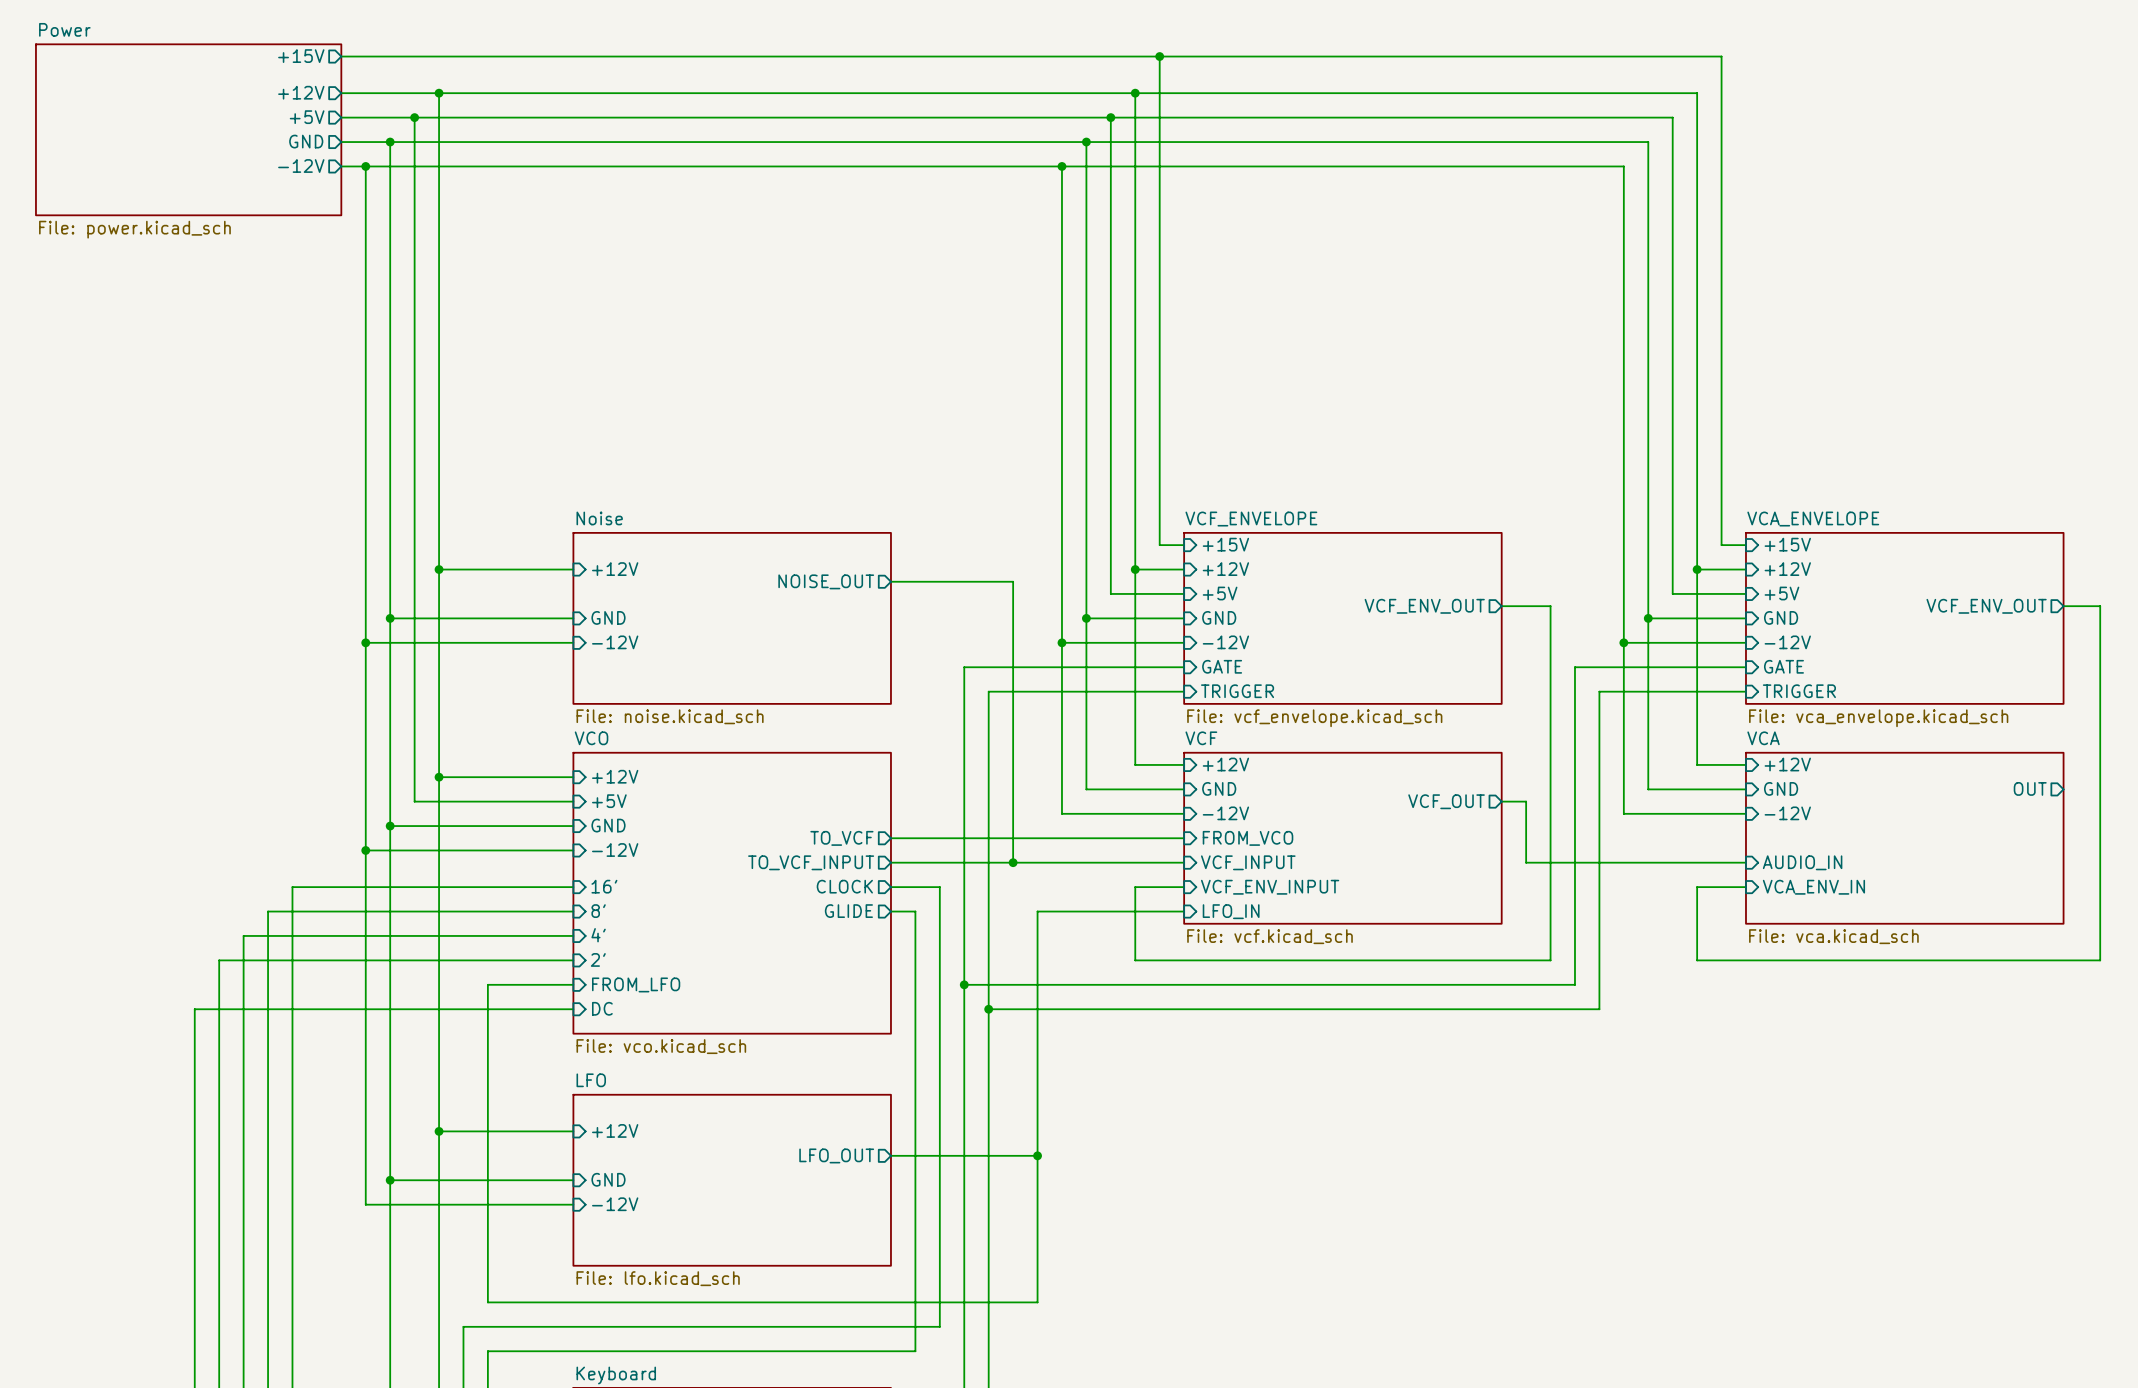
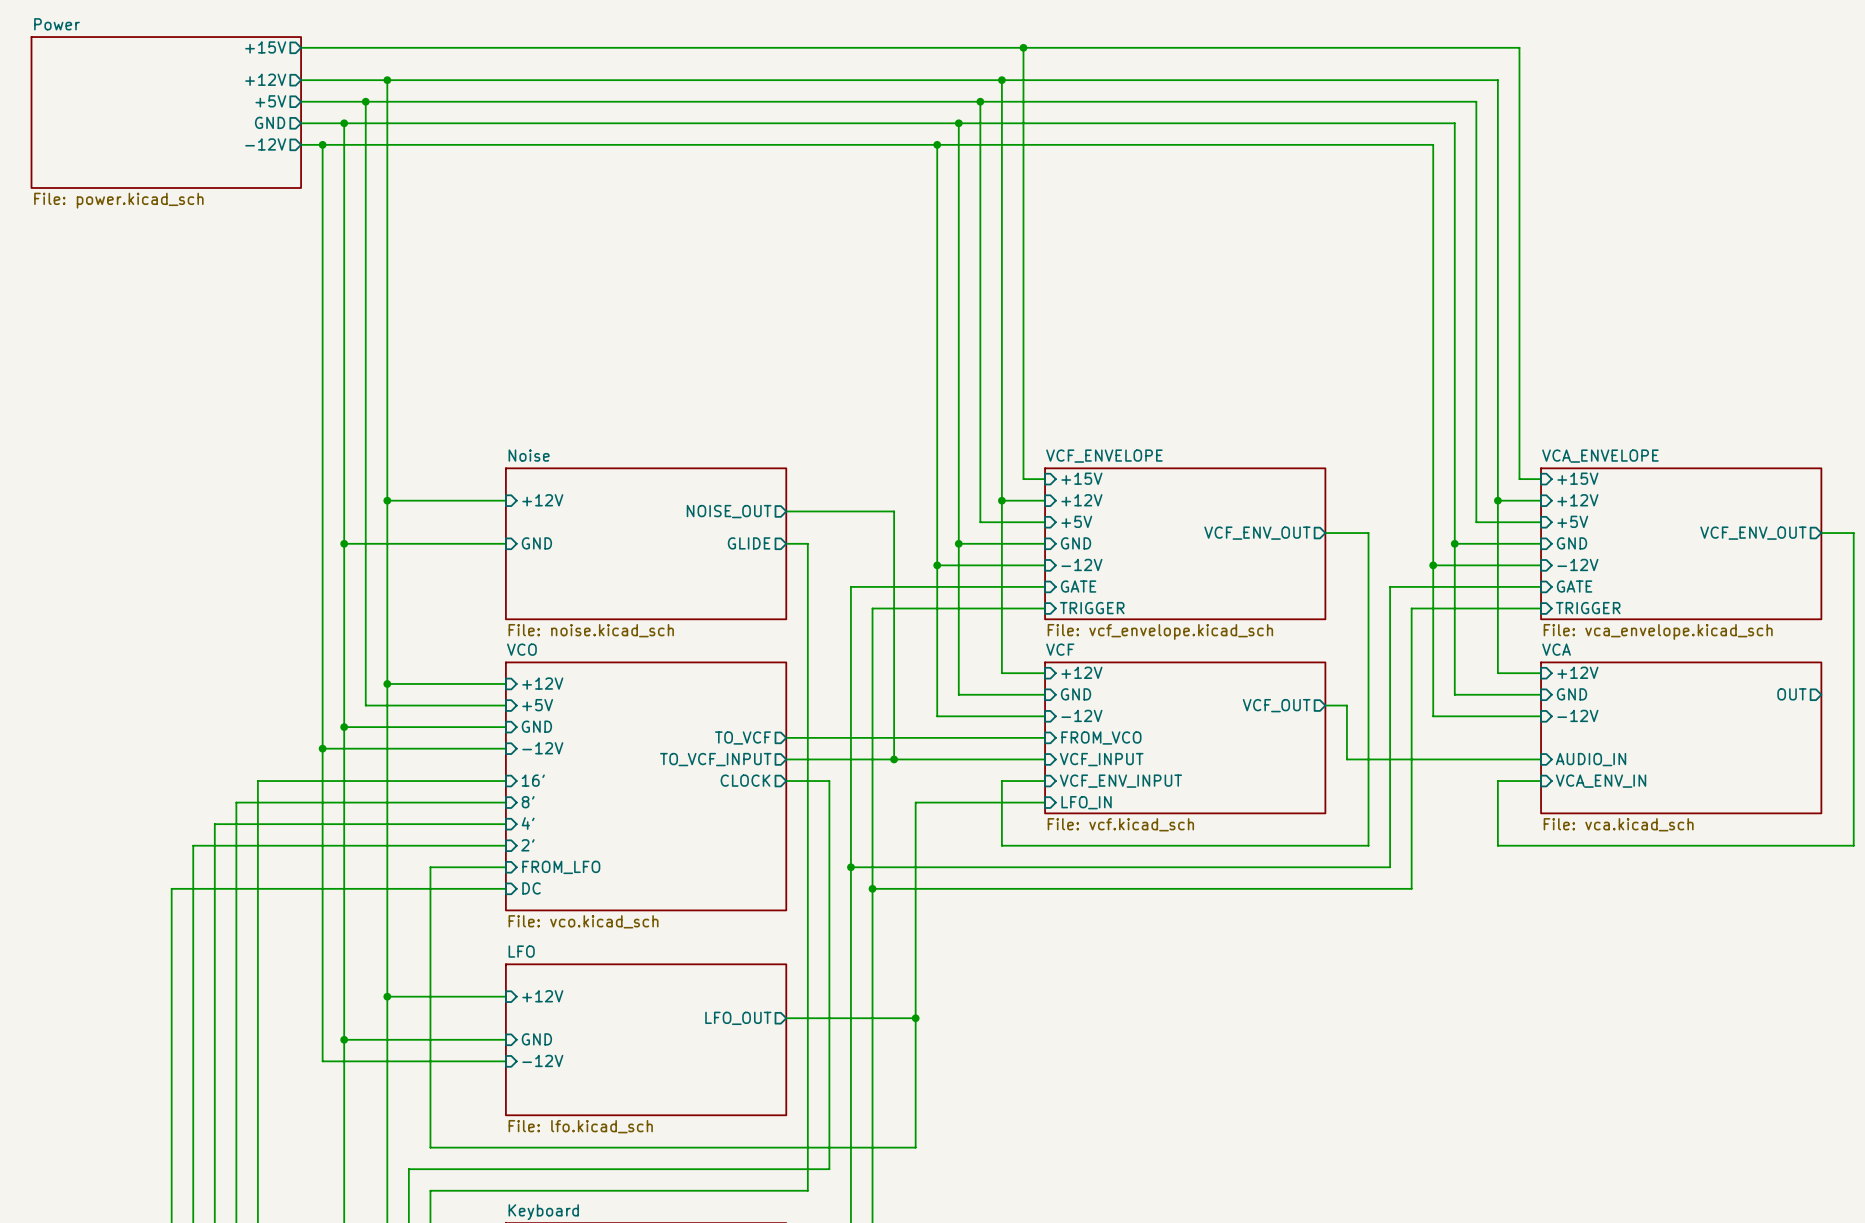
sheet pin: none -> GLIDE (749, 543)
wire: (365, 642) (573, 642) -> none
junction: (365, 642) -> none
sheet pin: -12V (615, 642) -> none
sheet pin: GLIDE (848, 911) -> none
wire: (890, 911) (915, 911) -> (786, 543) (807, 543) (807, 802)

